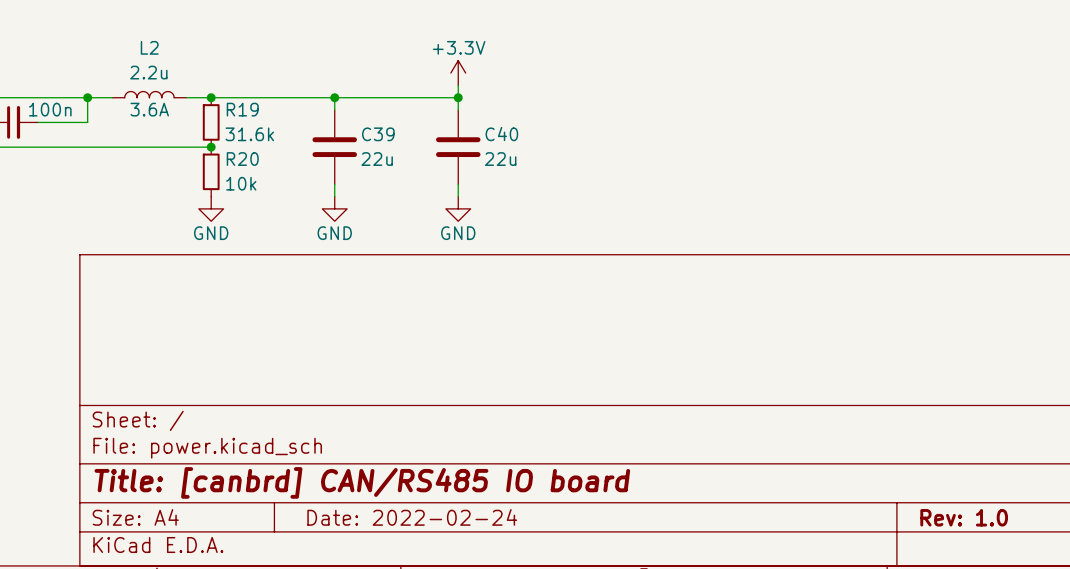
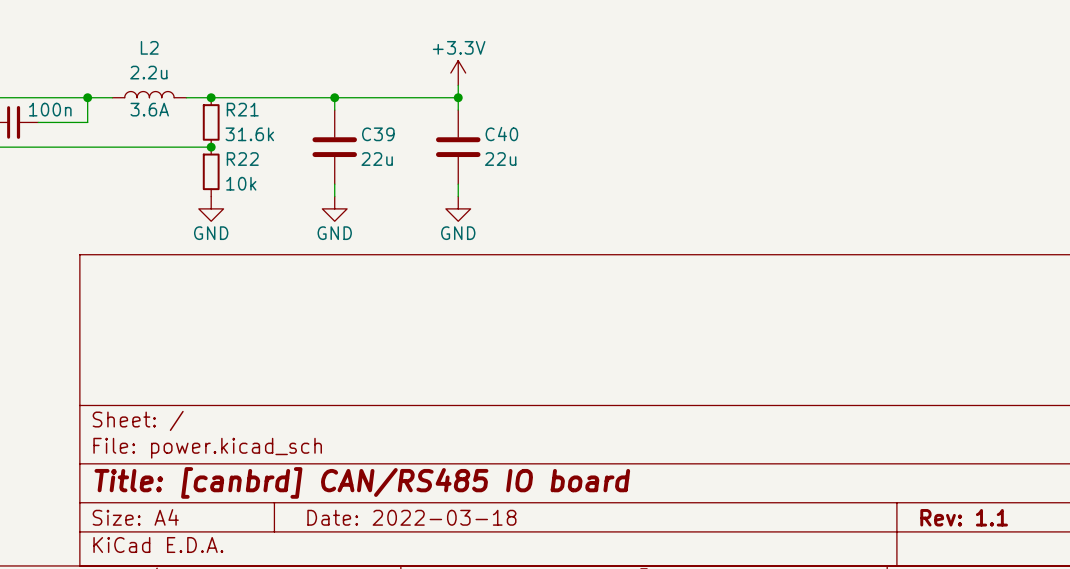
R19 name: R19 (242, 109) -> R21 (242, 109)
R20 name: R20 (242, 159) -> R22 (242, 159)
title block: Date: 2022-02-24 (412, 517) -> Date: 2022-03-18 (411, 517)
title block: Rev: 1.0 (964, 517) -> Rev: 1.1 (964, 517)

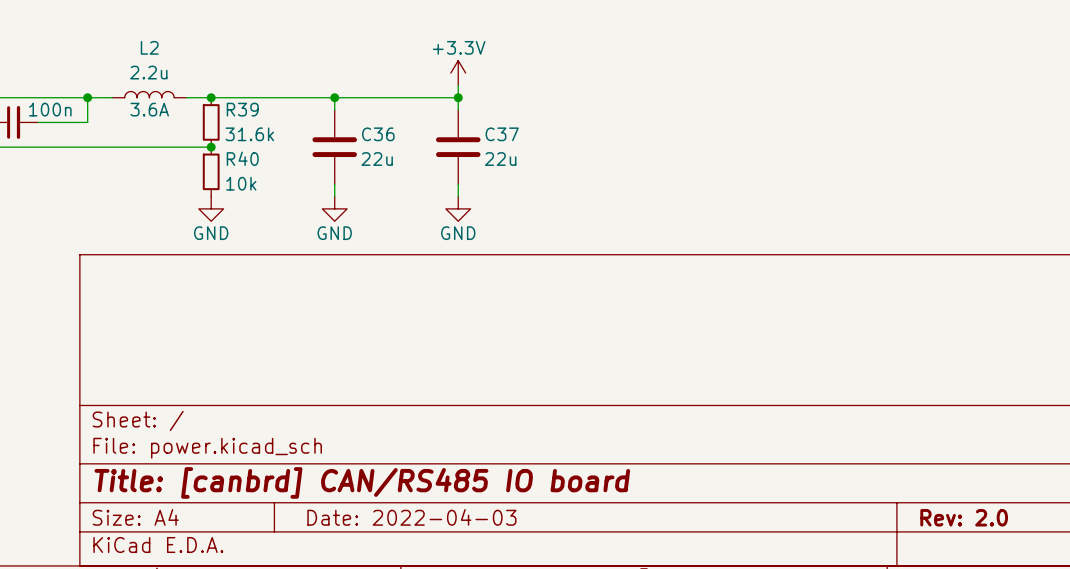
R21 name: R21 (242, 109) -> R39 (242, 109)
C39 name: C39 (378, 134) -> C36 (378, 134)
C40 name: C40 (501, 134) -> C37 (502, 134)
R22 name: R22 (242, 159) -> R40 (242, 158)
title block: Date: 2022-03-18 (411, 517) -> Date: 2022-04-03 (411, 517)
title block: Rev: 1.1 (964, 517) -> Rev: 2.0 (964, 517)

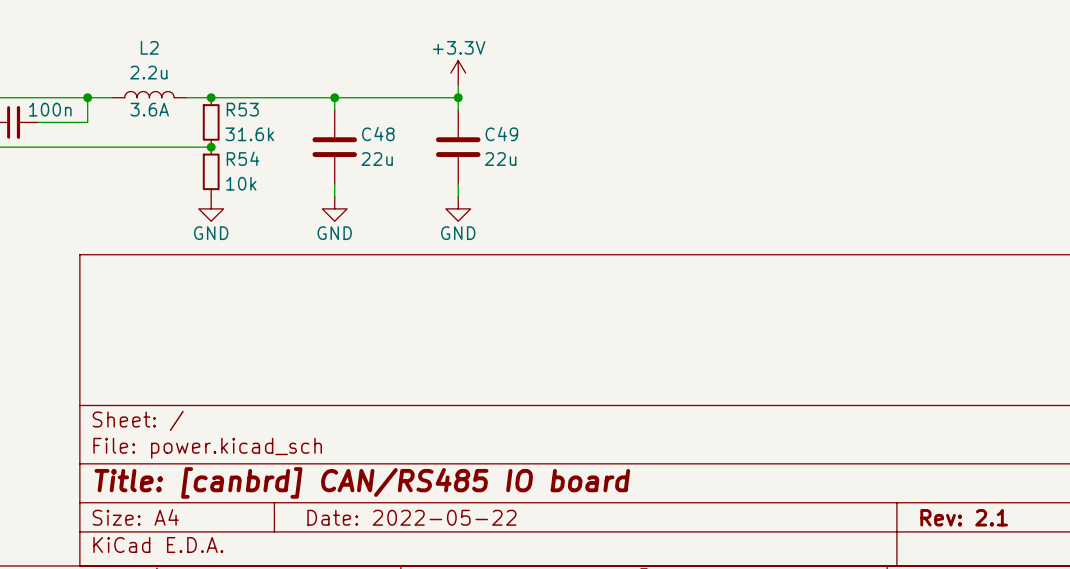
R39 name: R39 (242, 109) -> R53 (242, 109)
C36 name: C36 (378, 134) -> C48 (378, 134)
C37 name: C37 (502, 134) -> C49 (501, 134)
R40 name: R40 (242, 158) -> R54 (243, 158)
title block: Date: 2022-04-03 (411, 517) -> Date: 2022-05-22 (411, 517)
title block: Rev: 2.0 (964, 517) -> Rev: 2.1 (964, 517)

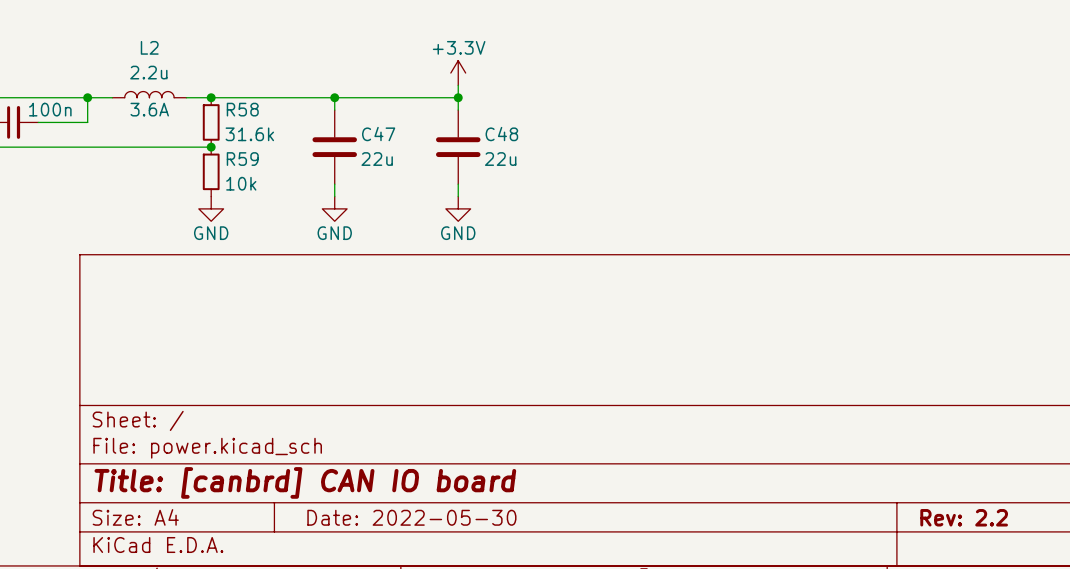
R53 name: R53 (242, 109) -> R58 (242, 109)
C48 name: C48 (378, 134) -> C47 (378, 134)
C49 name: C49 (501, 134) -> C48 (501, 134)
R54 name: R54 (243, 158) -> R59 (242, 159)
title block: Title: [canbrd] CAN/RS485 IO board (362, 482) -> Title: [canbrd] CAN IO board (305, 482)
title block: Date: 2022-05-22 (411, 517) -> Date: 2022-05-30 (411, 517)
title block: Rev: 2.1 (964, 517) -> Rev: 2.2 (964, 517)

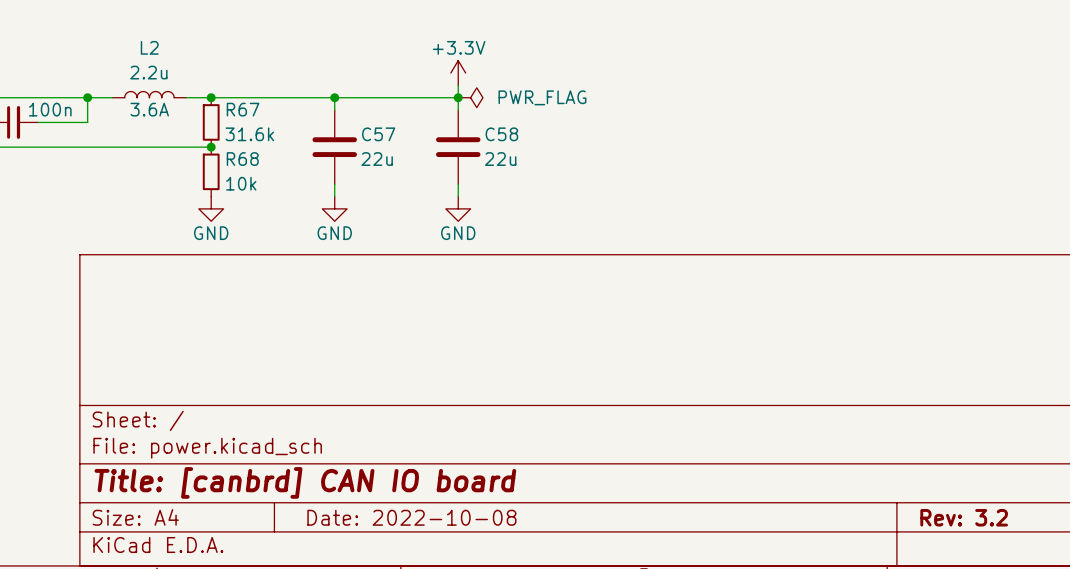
power symbol: none -> PWR_FLAG (470, 97)
R58 name: R58 (242, 109) -> R67 (243, 109)
C47 name: C47 (378, 134) -> C57 (378, 134)
C48 name: C48 (501, 134) -> C58 (501, 134)
R59 name: R59 (242, 159) -> R68 (242, 159)
title block: Date: 2022-05-30 (411, 517) -> Date: 2022-10-08 (411, 517)
title block: Rev: 2.2 (964, 517) -> Rev: 3.2 (964, 517)

